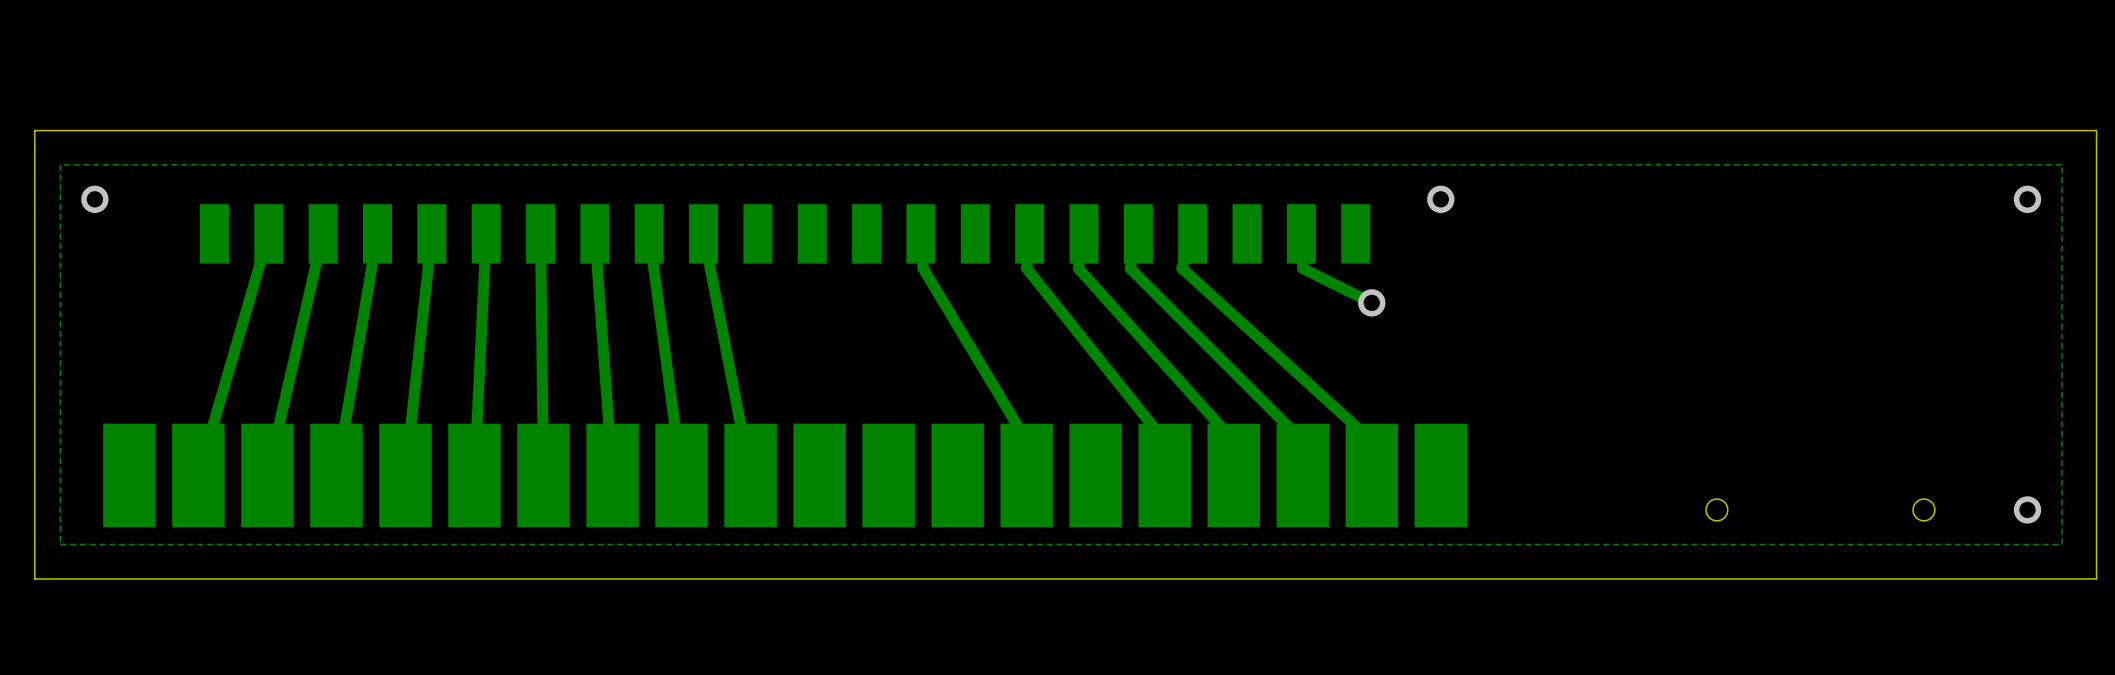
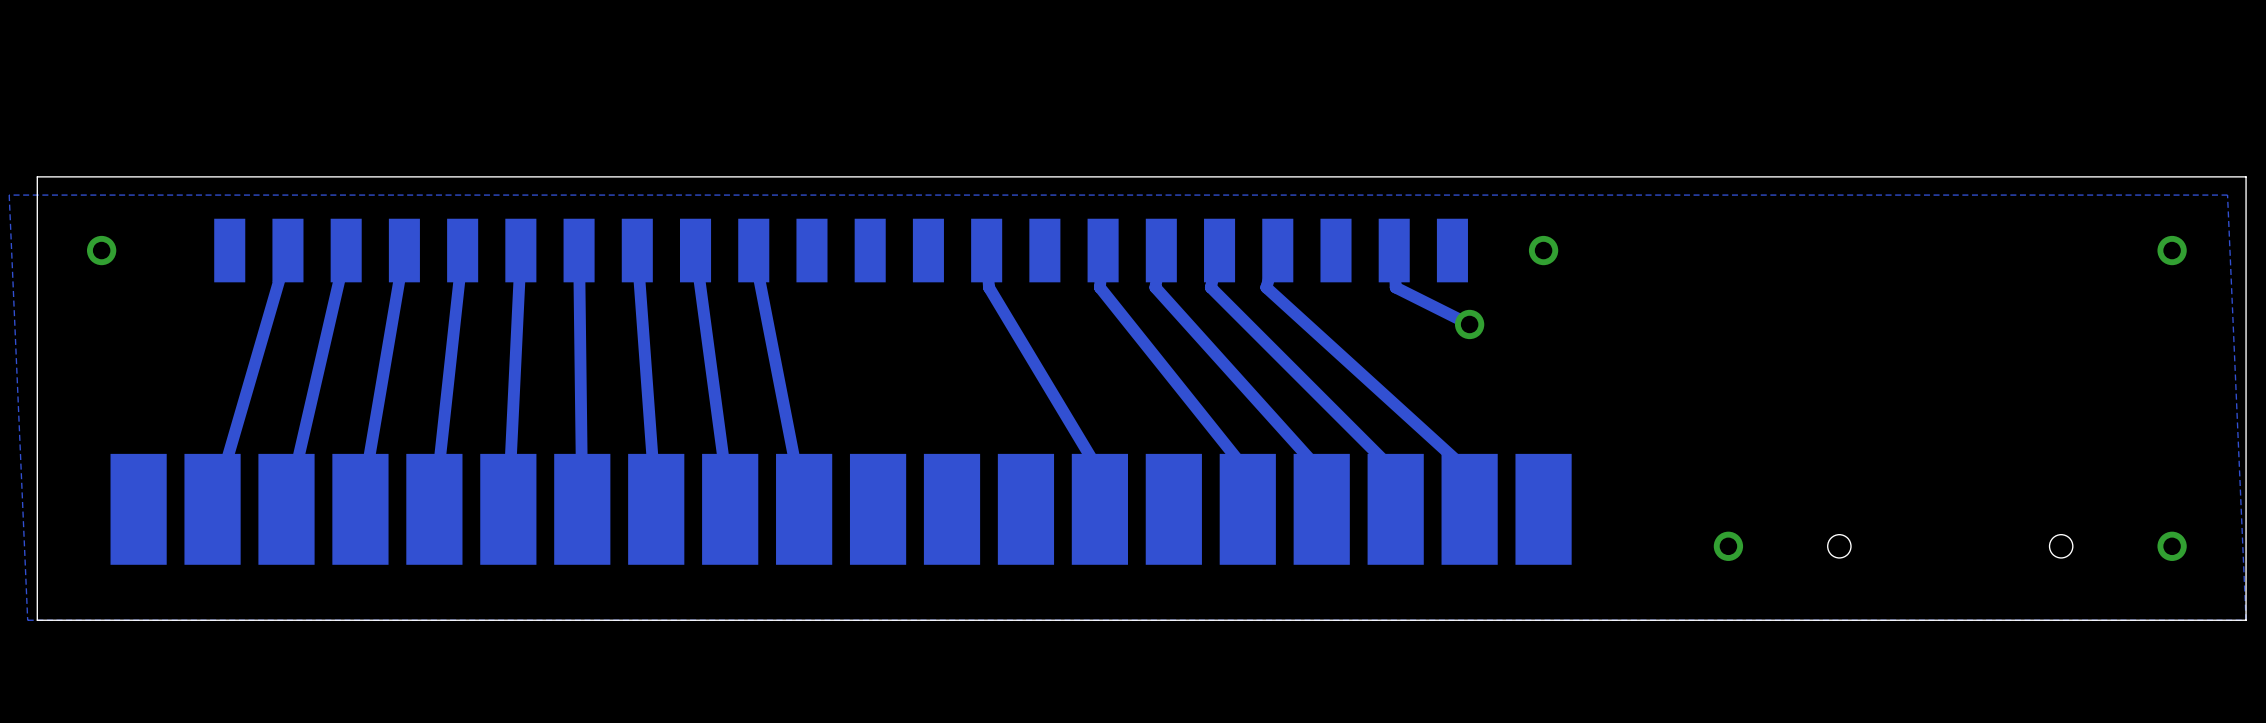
zone outline: (2062, 164) (60, 164) (60, 544) (2062, 544) (2062, 164) -> (2227, 195) (2246, 620) (27, 620) (9, 195) (2227, 195)
board edge: (2096, 165) (2096, 130) (34, 130) (34, 165) -> (2246, 176) (37, 176)
via position: (94, 199) -> (101, 250)
via position: (1440, 199) -> (1543, 250)
via position: (2027, 199) -> (2172, 250)
via: none -> (1728, 546)

